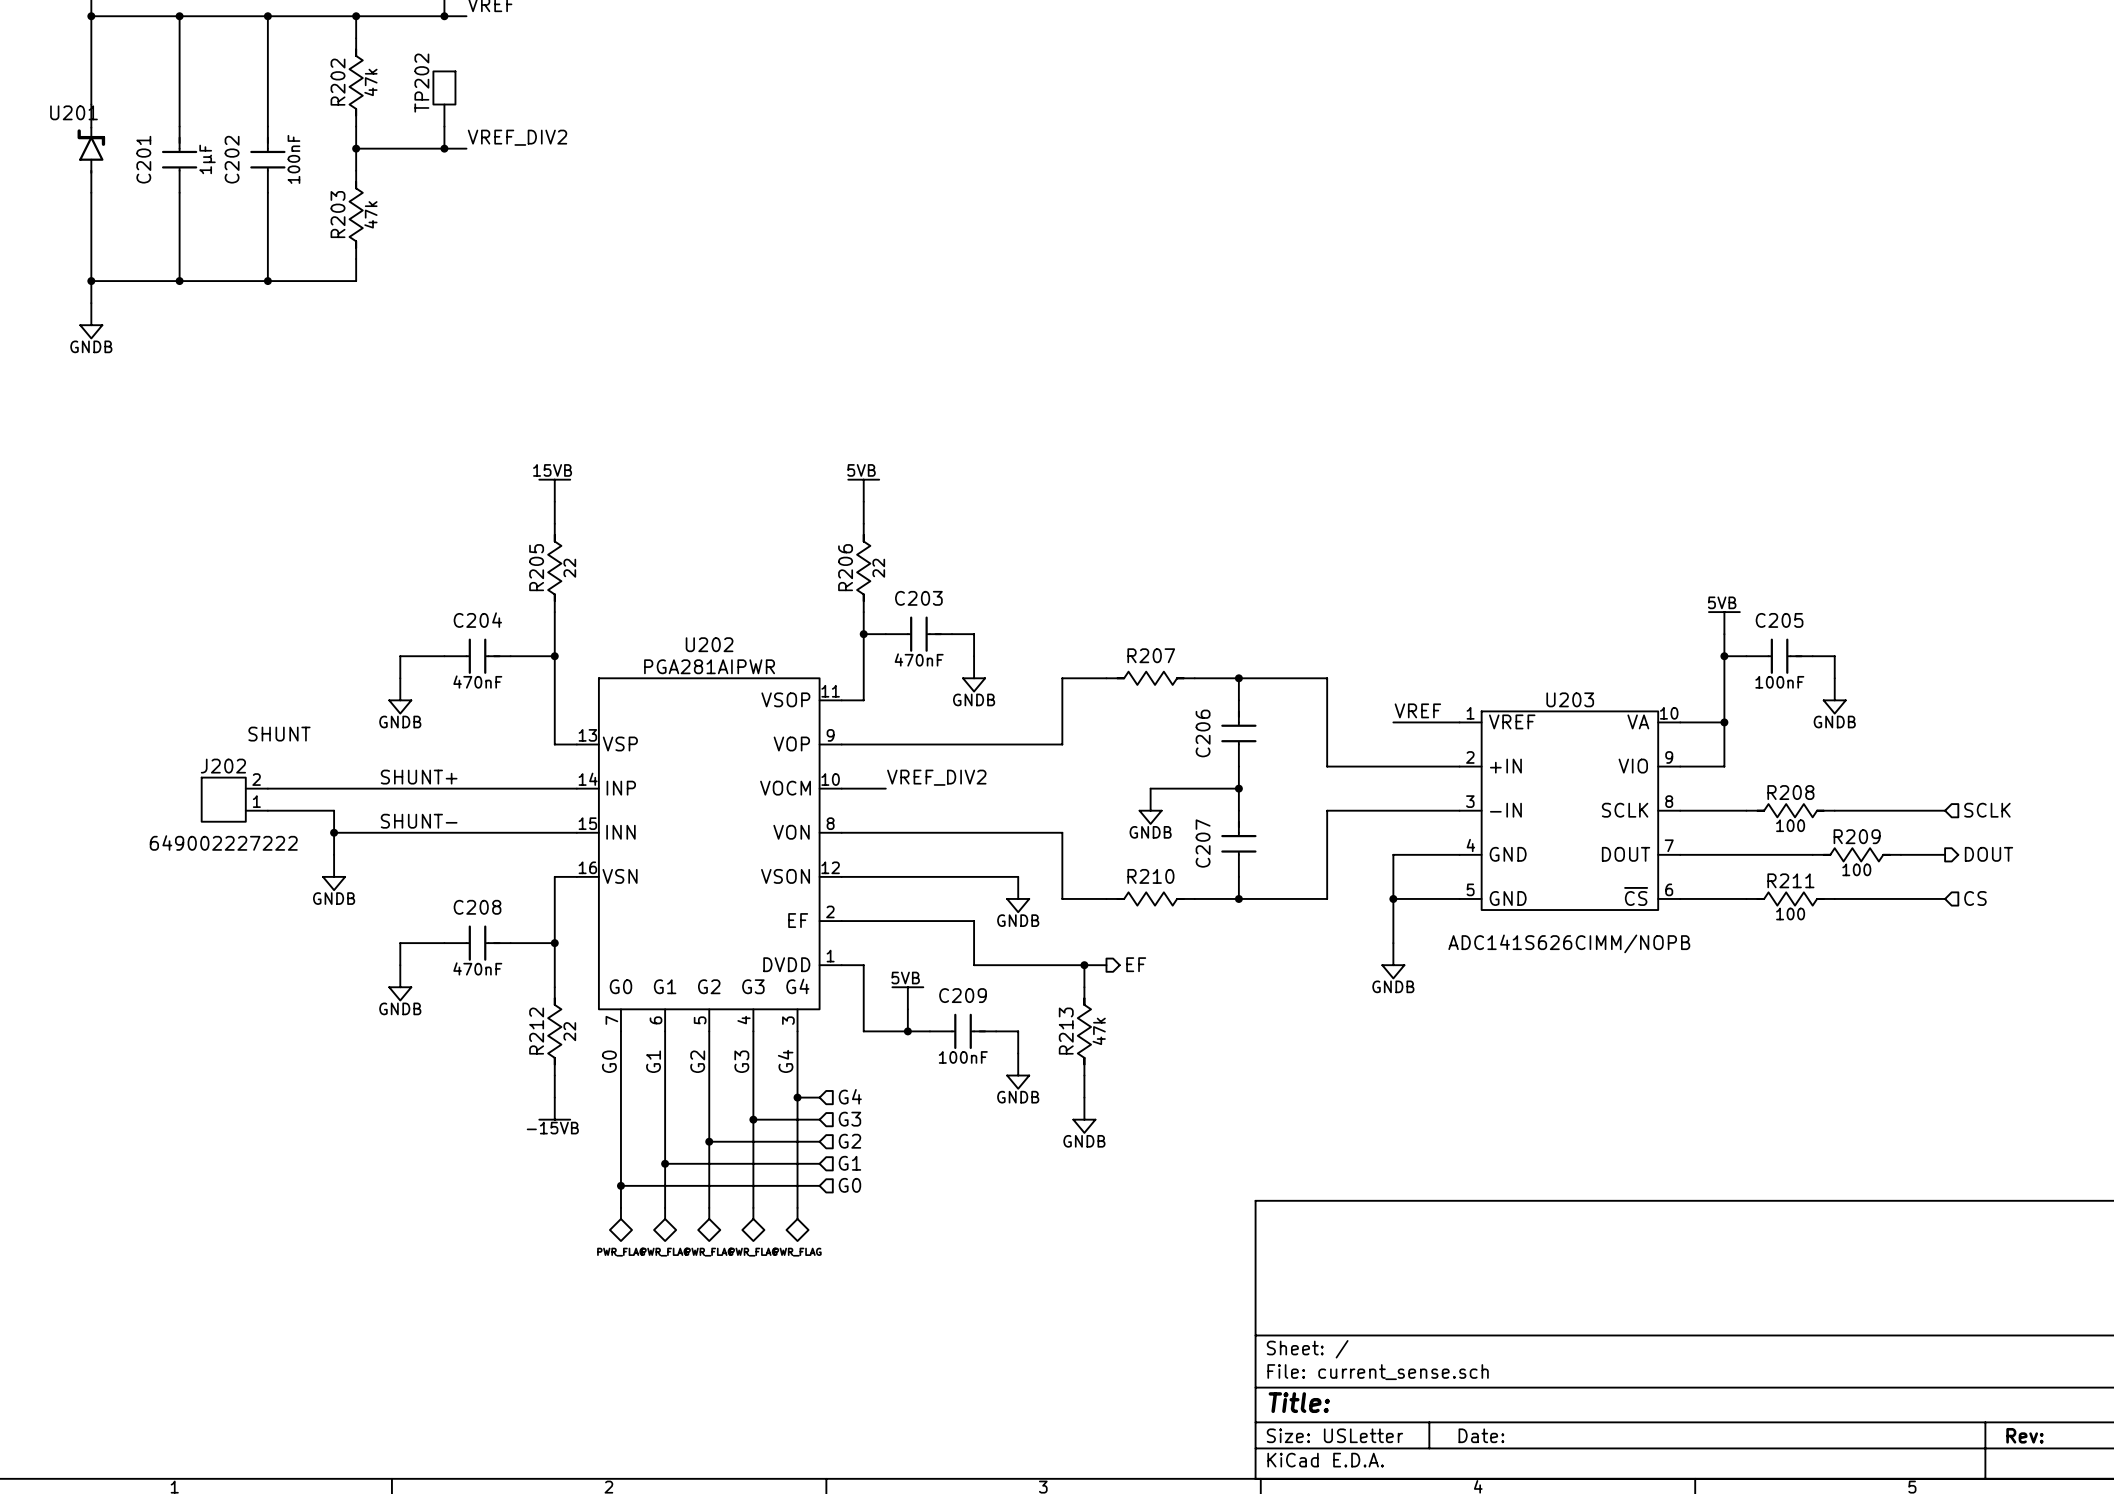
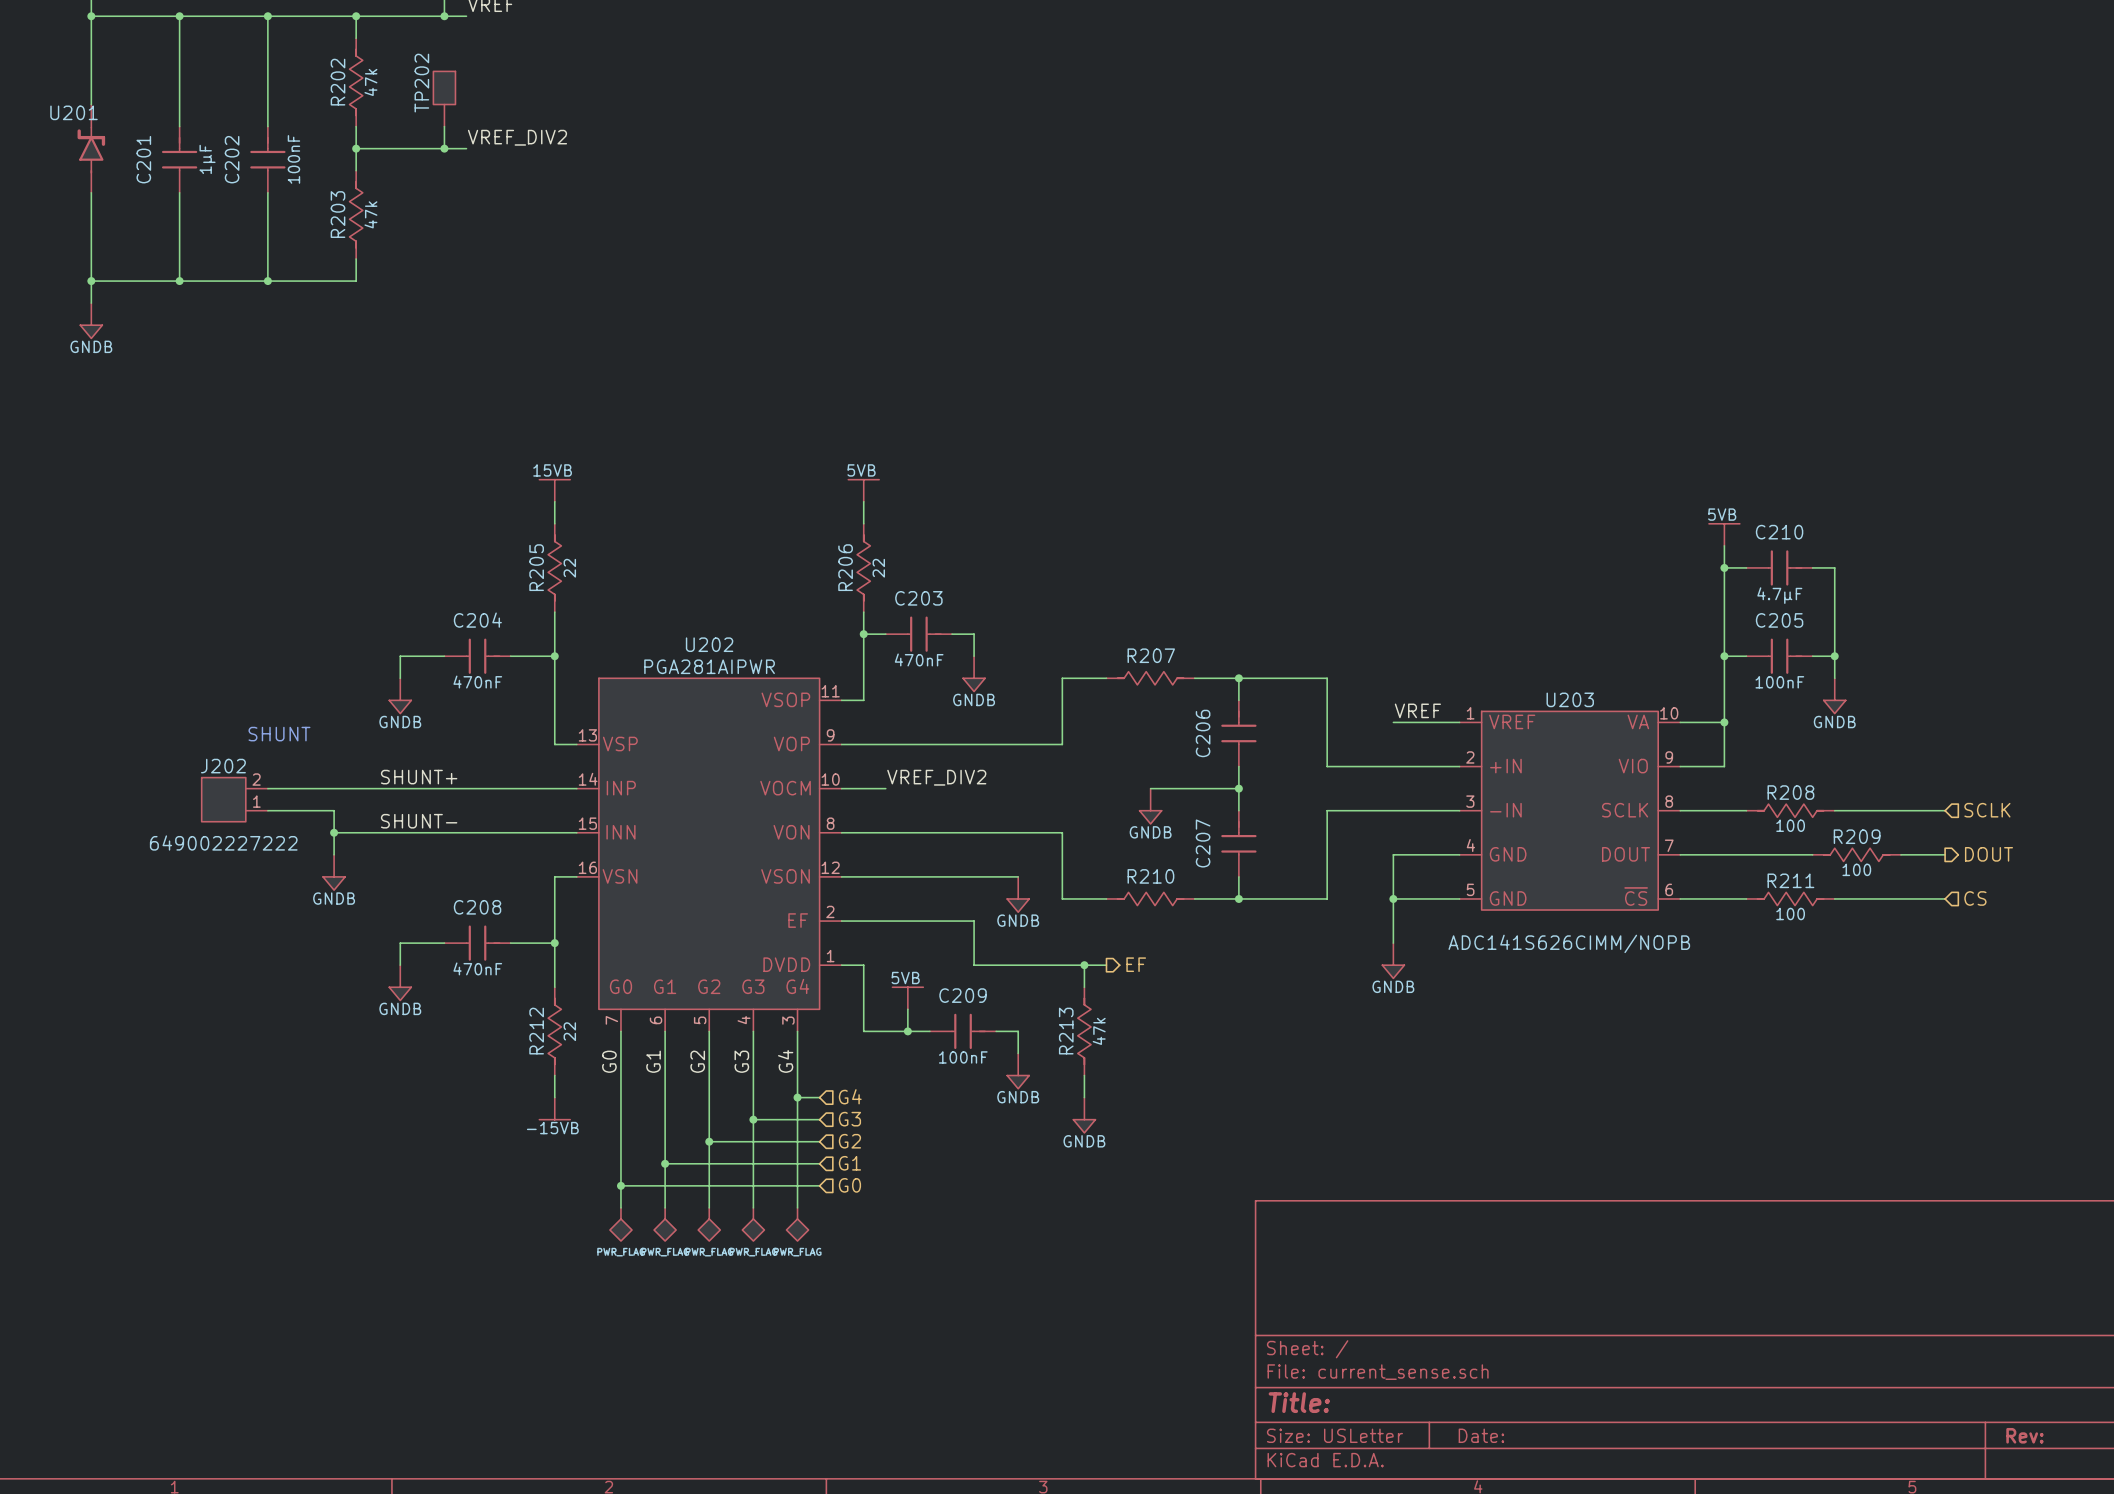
wire: none -> (1724, 545) (1724, 634)
wire: none -> (1724, 567) (1746, 567)
junction: none -> (1724, 567)
C210: none -> (1779, 567)
wire: none -> (1812, 567) (1834, 567) (1834, 656)
power symbol position: 5VB (1724, 623) -> 5VB (1724, 534)
junction: none -> (1834, 656)

